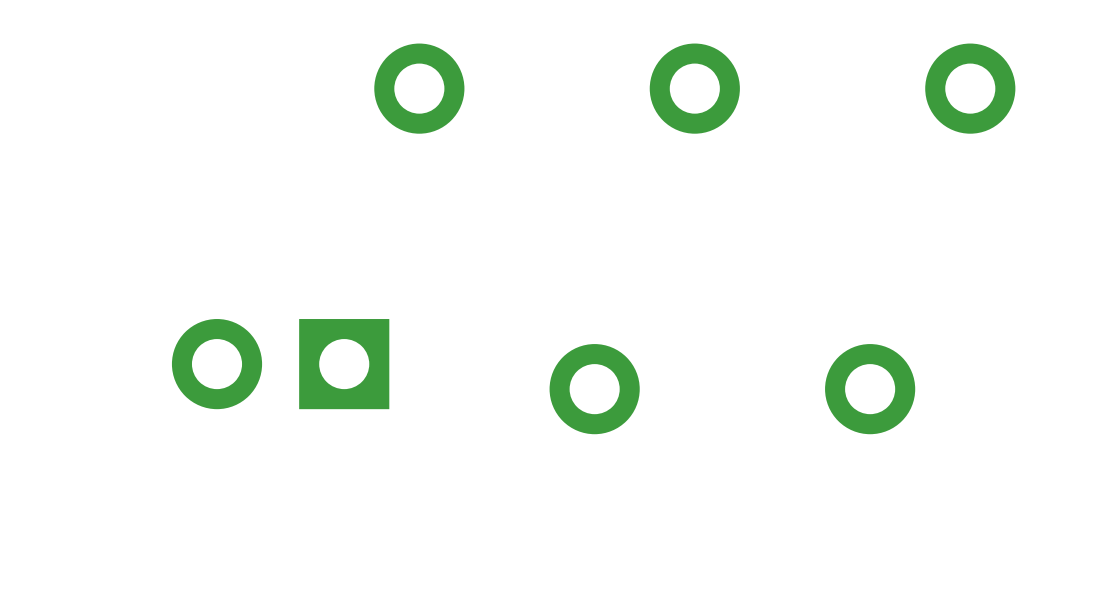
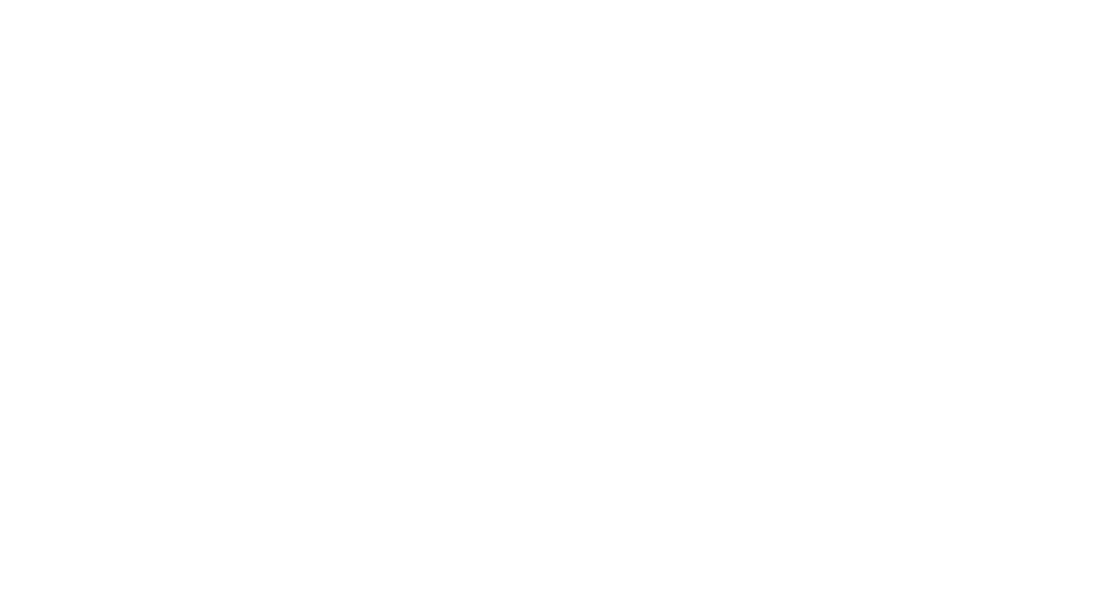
part: (419, 88) -> none
part: (694, 88) -> none
part: (970, 88) -> none
part: (280, 364) -> none
part: (594, 389) -> none
part: (870, 389) -> none

